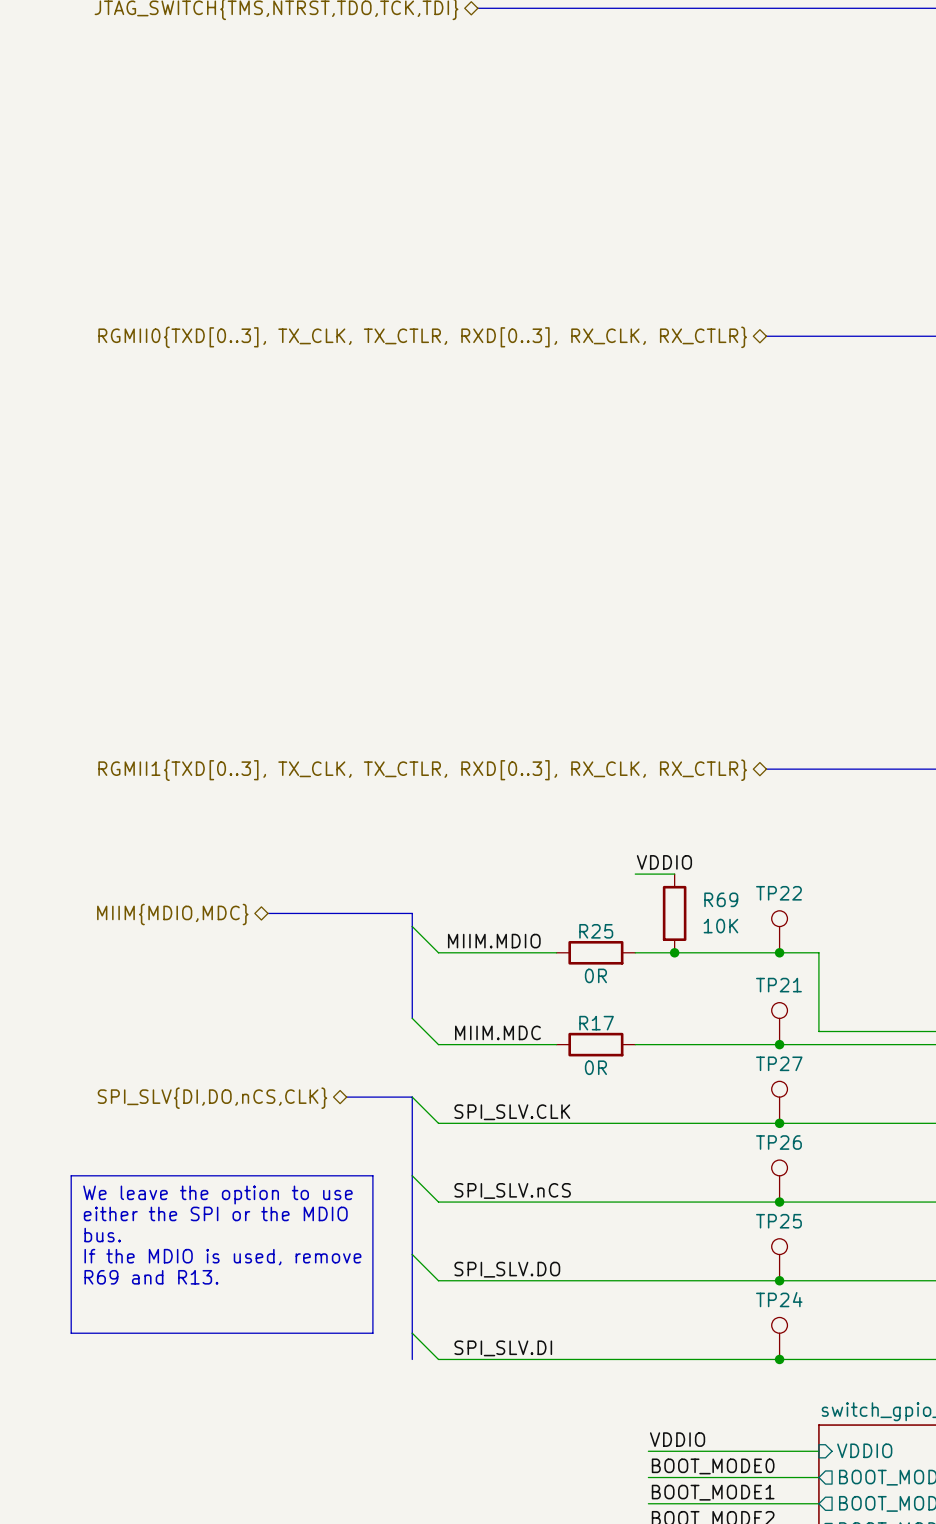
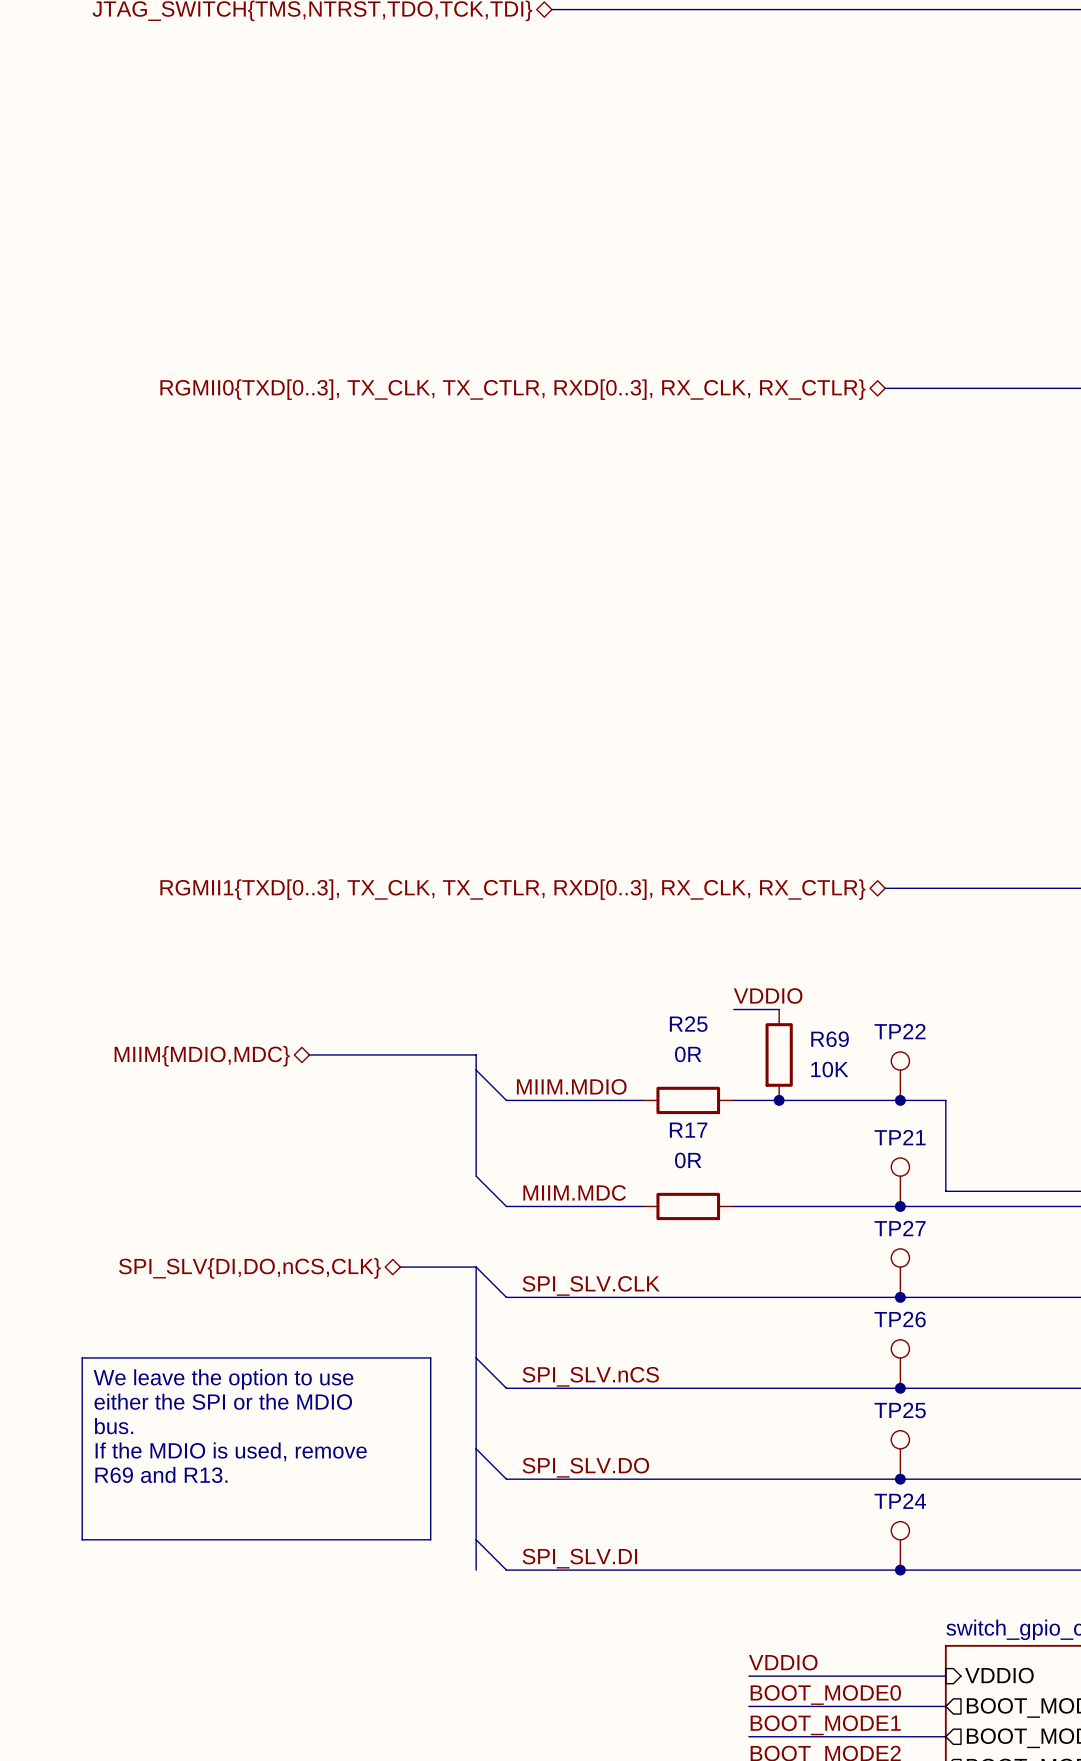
R25 name position: R25 (596, 931) -> R25 (688, 1024)
R25 value position: 0R (595, 975) -> 0R (688, 1054)
R17 name position: R17 (596, 1023) -> R17 (688, 1130)
R17 value position: 0R (595, 1067) -> 0R (688, 1160)

